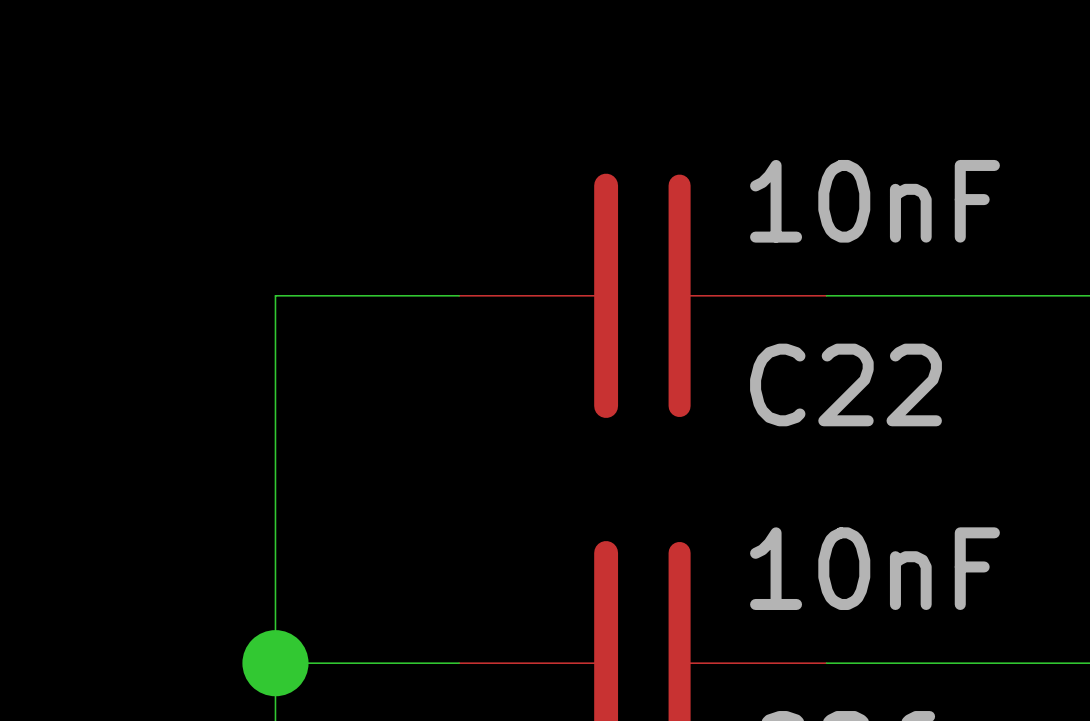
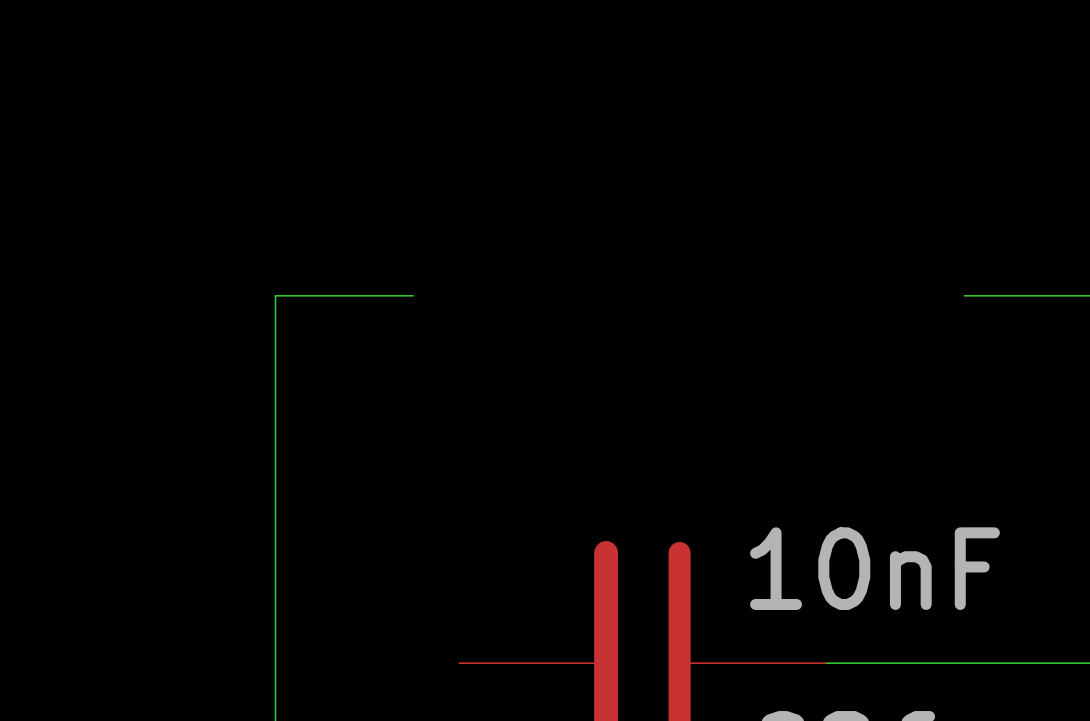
wire: (413, 295) (459, 295) -> none
C22: 10nF (642, 295) -> none
wire: (826, 295) (964, 295) -> none
wire: (275, 663) (459, 663) -> none
junction: (275, 663) -> none

